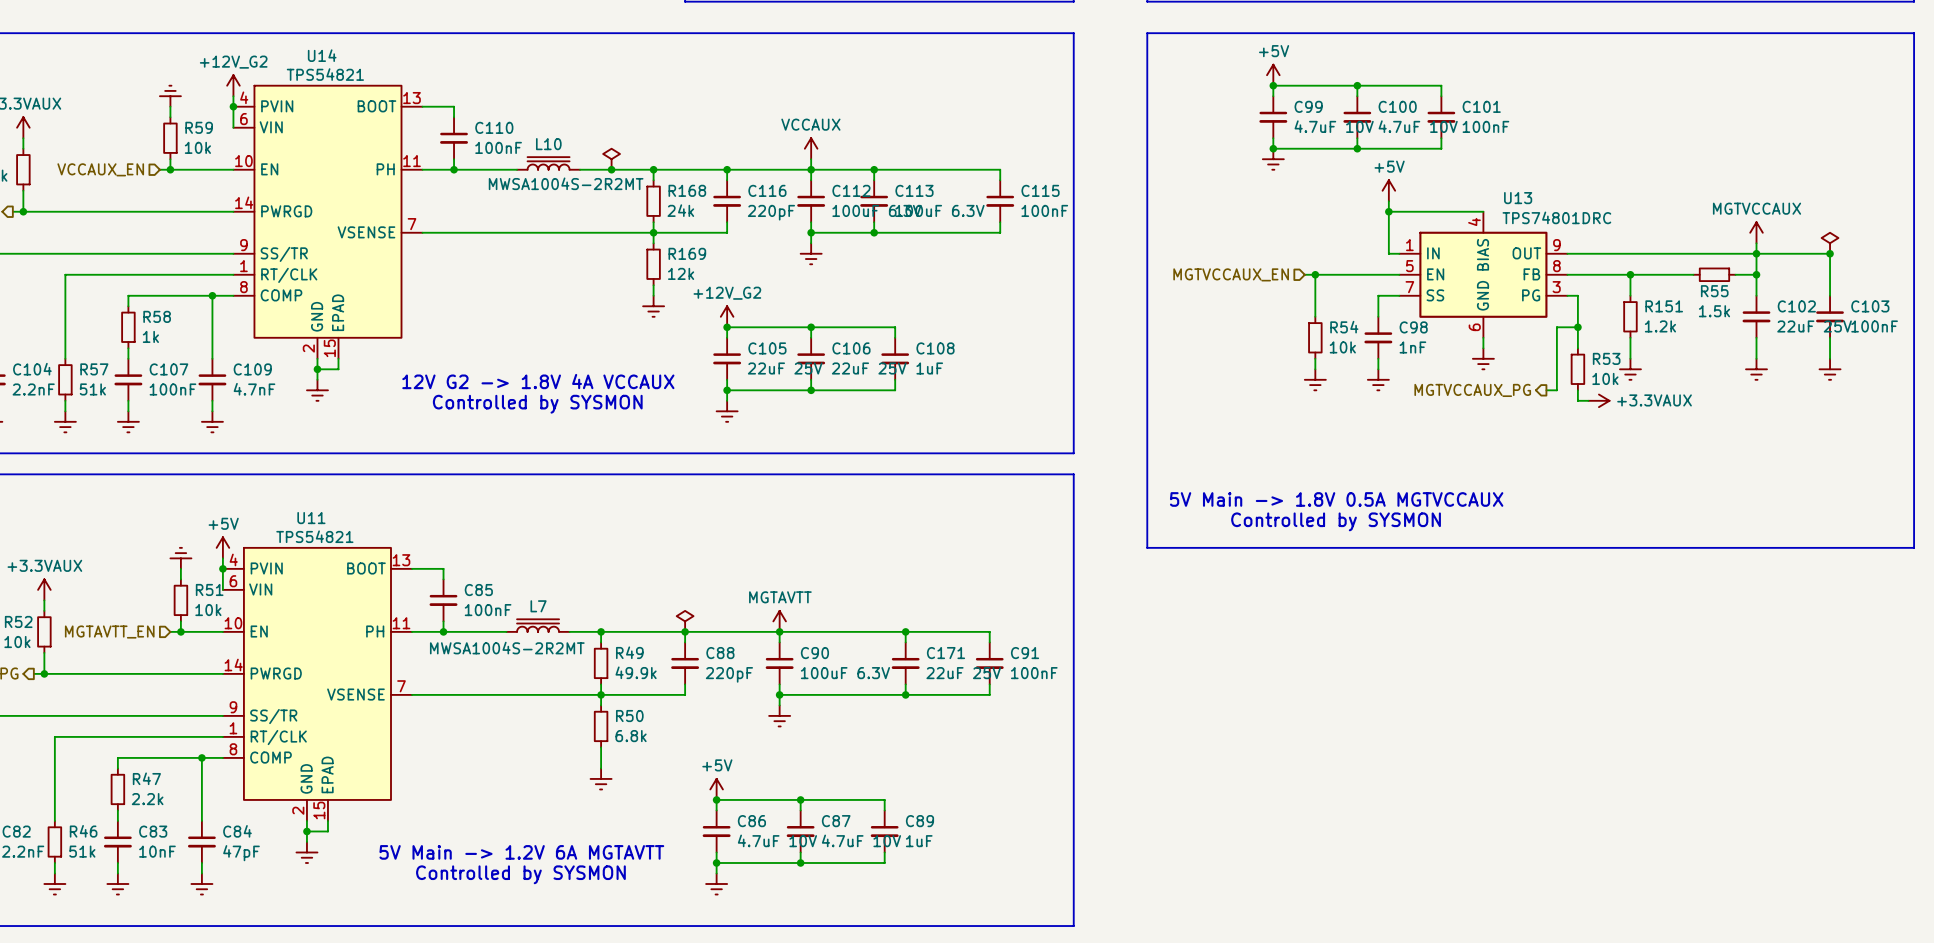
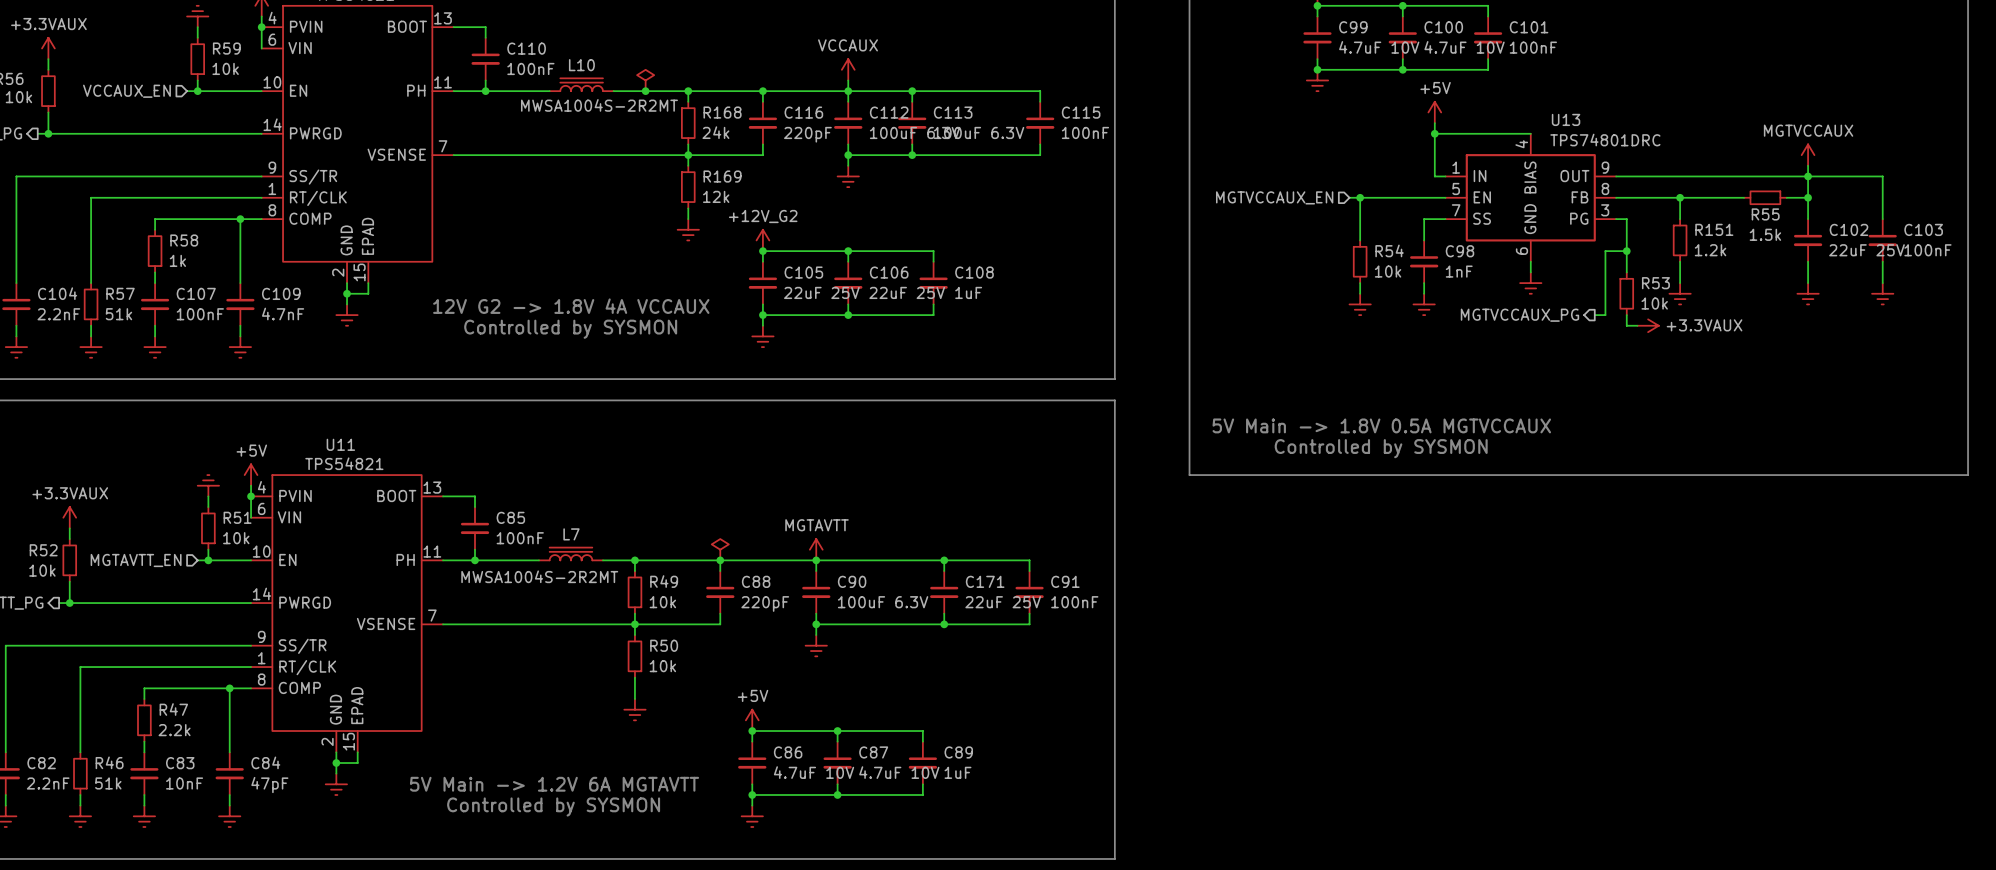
power symbol: (1830, 243) -> none
junction: (1830, 253) -> none
R49 value: 49.9k (636, 672) -> 10k (662, 602)
R50 value: 6.8k (631, 736) -> 10k (662, 666)

